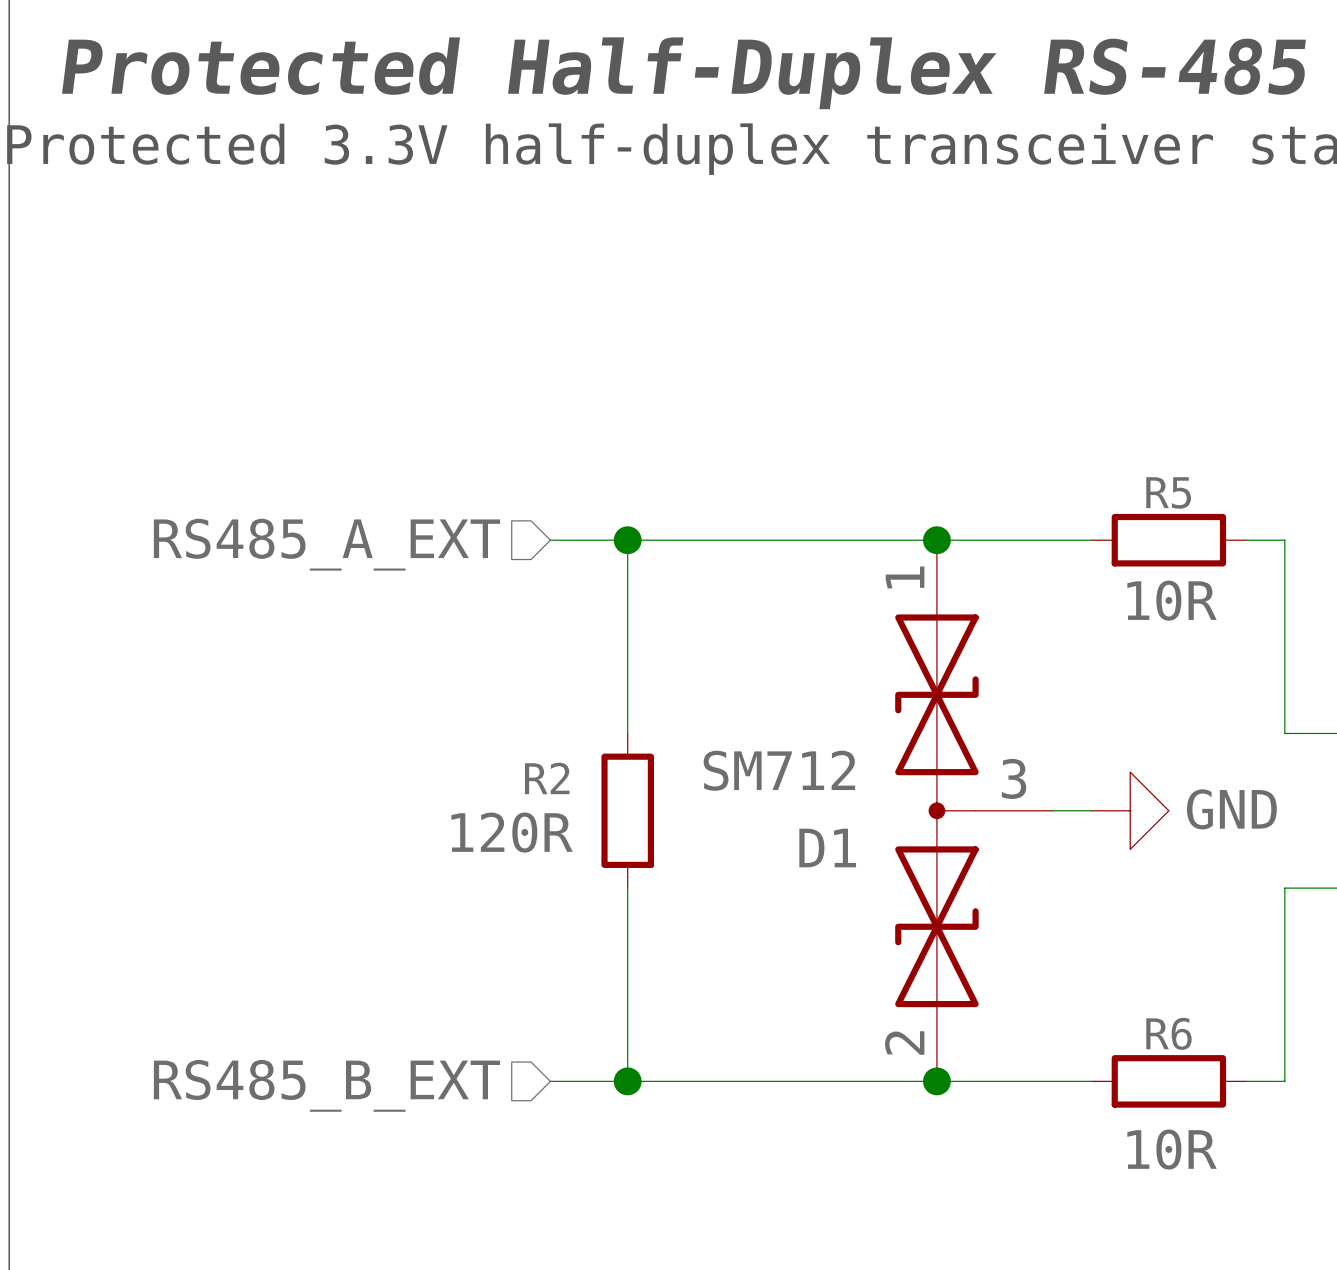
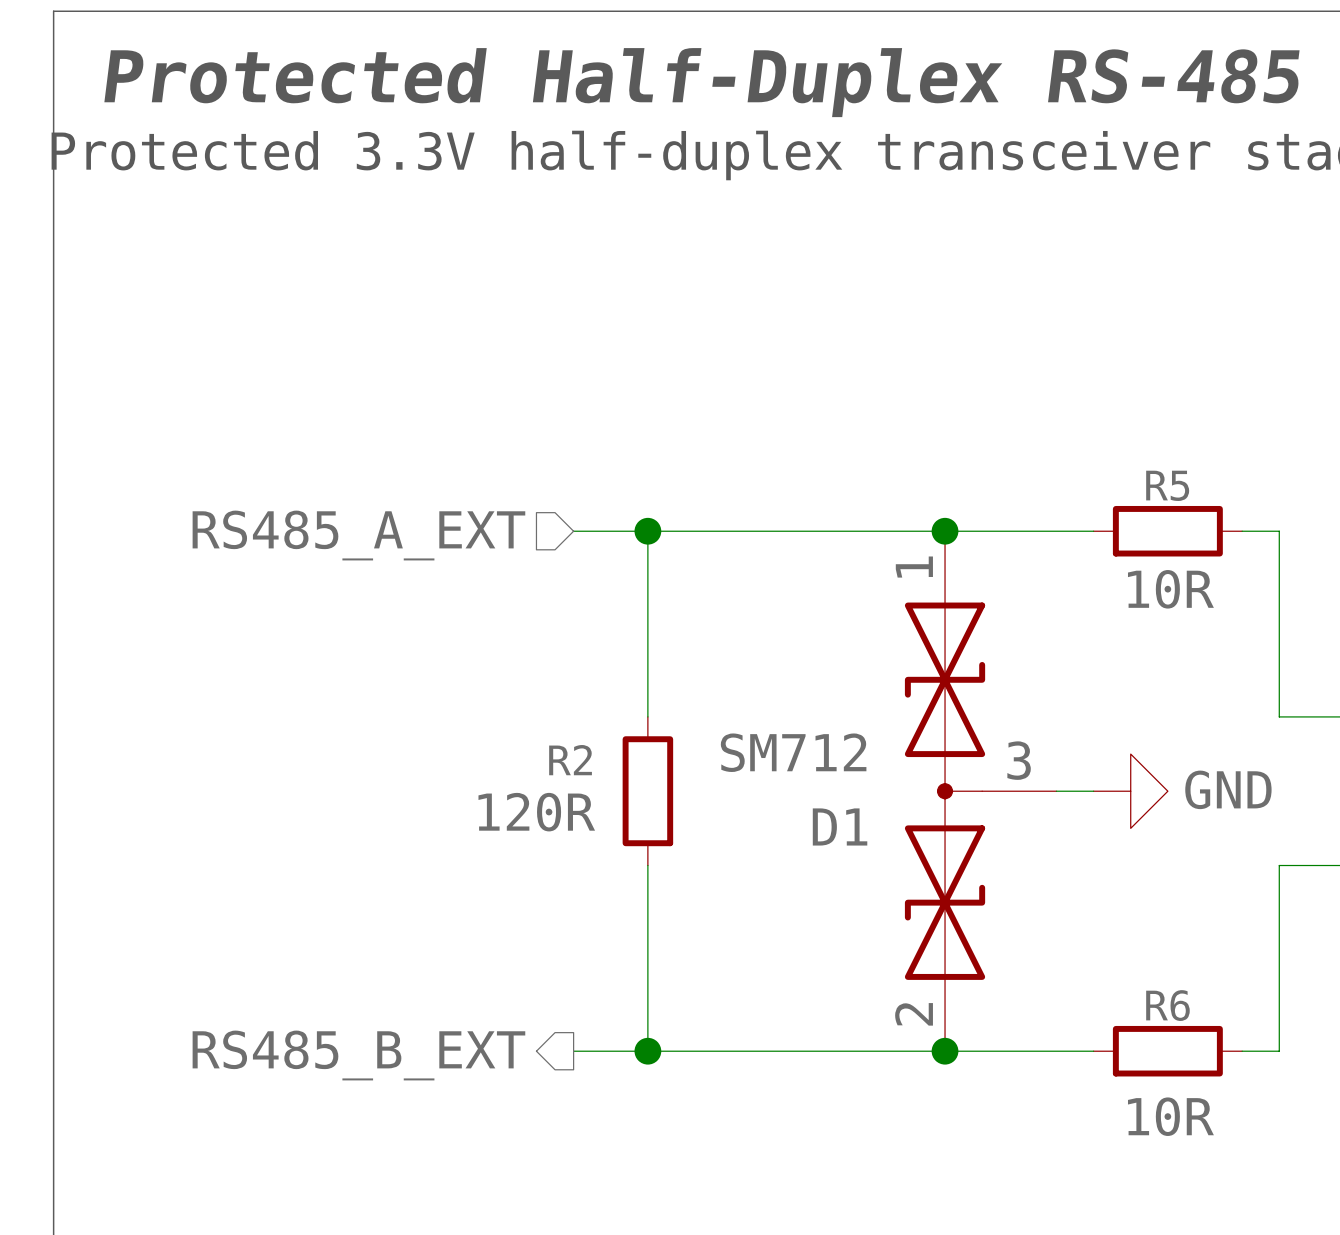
hierarchical label shape: input (326, 1085) -> output (358, 1055)

